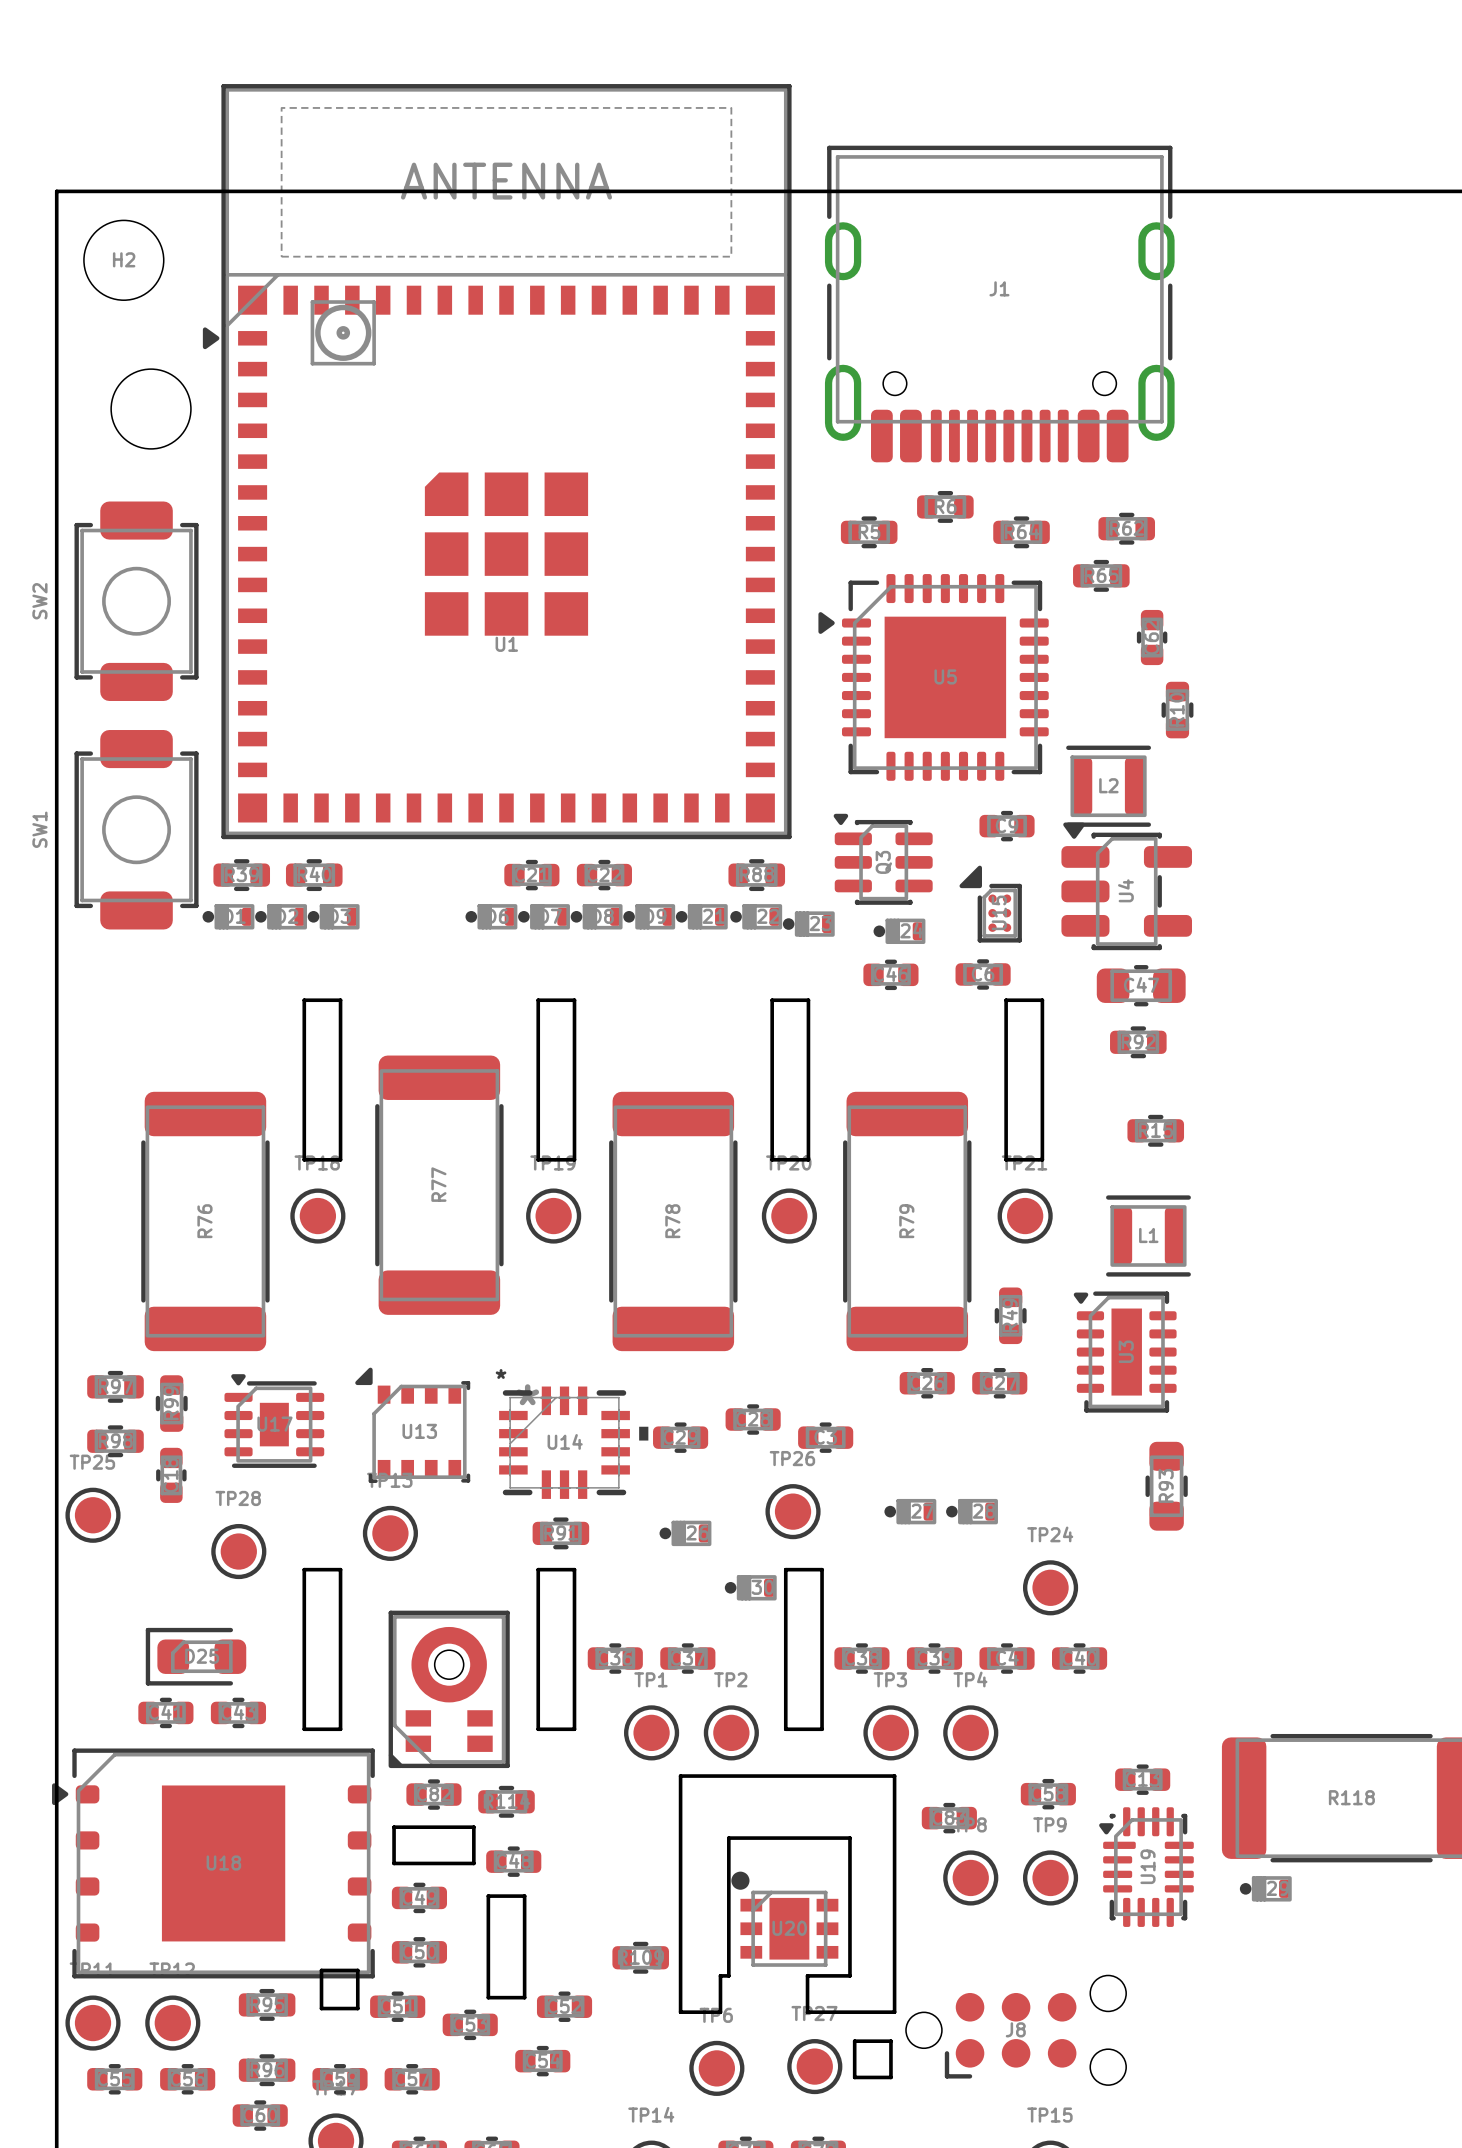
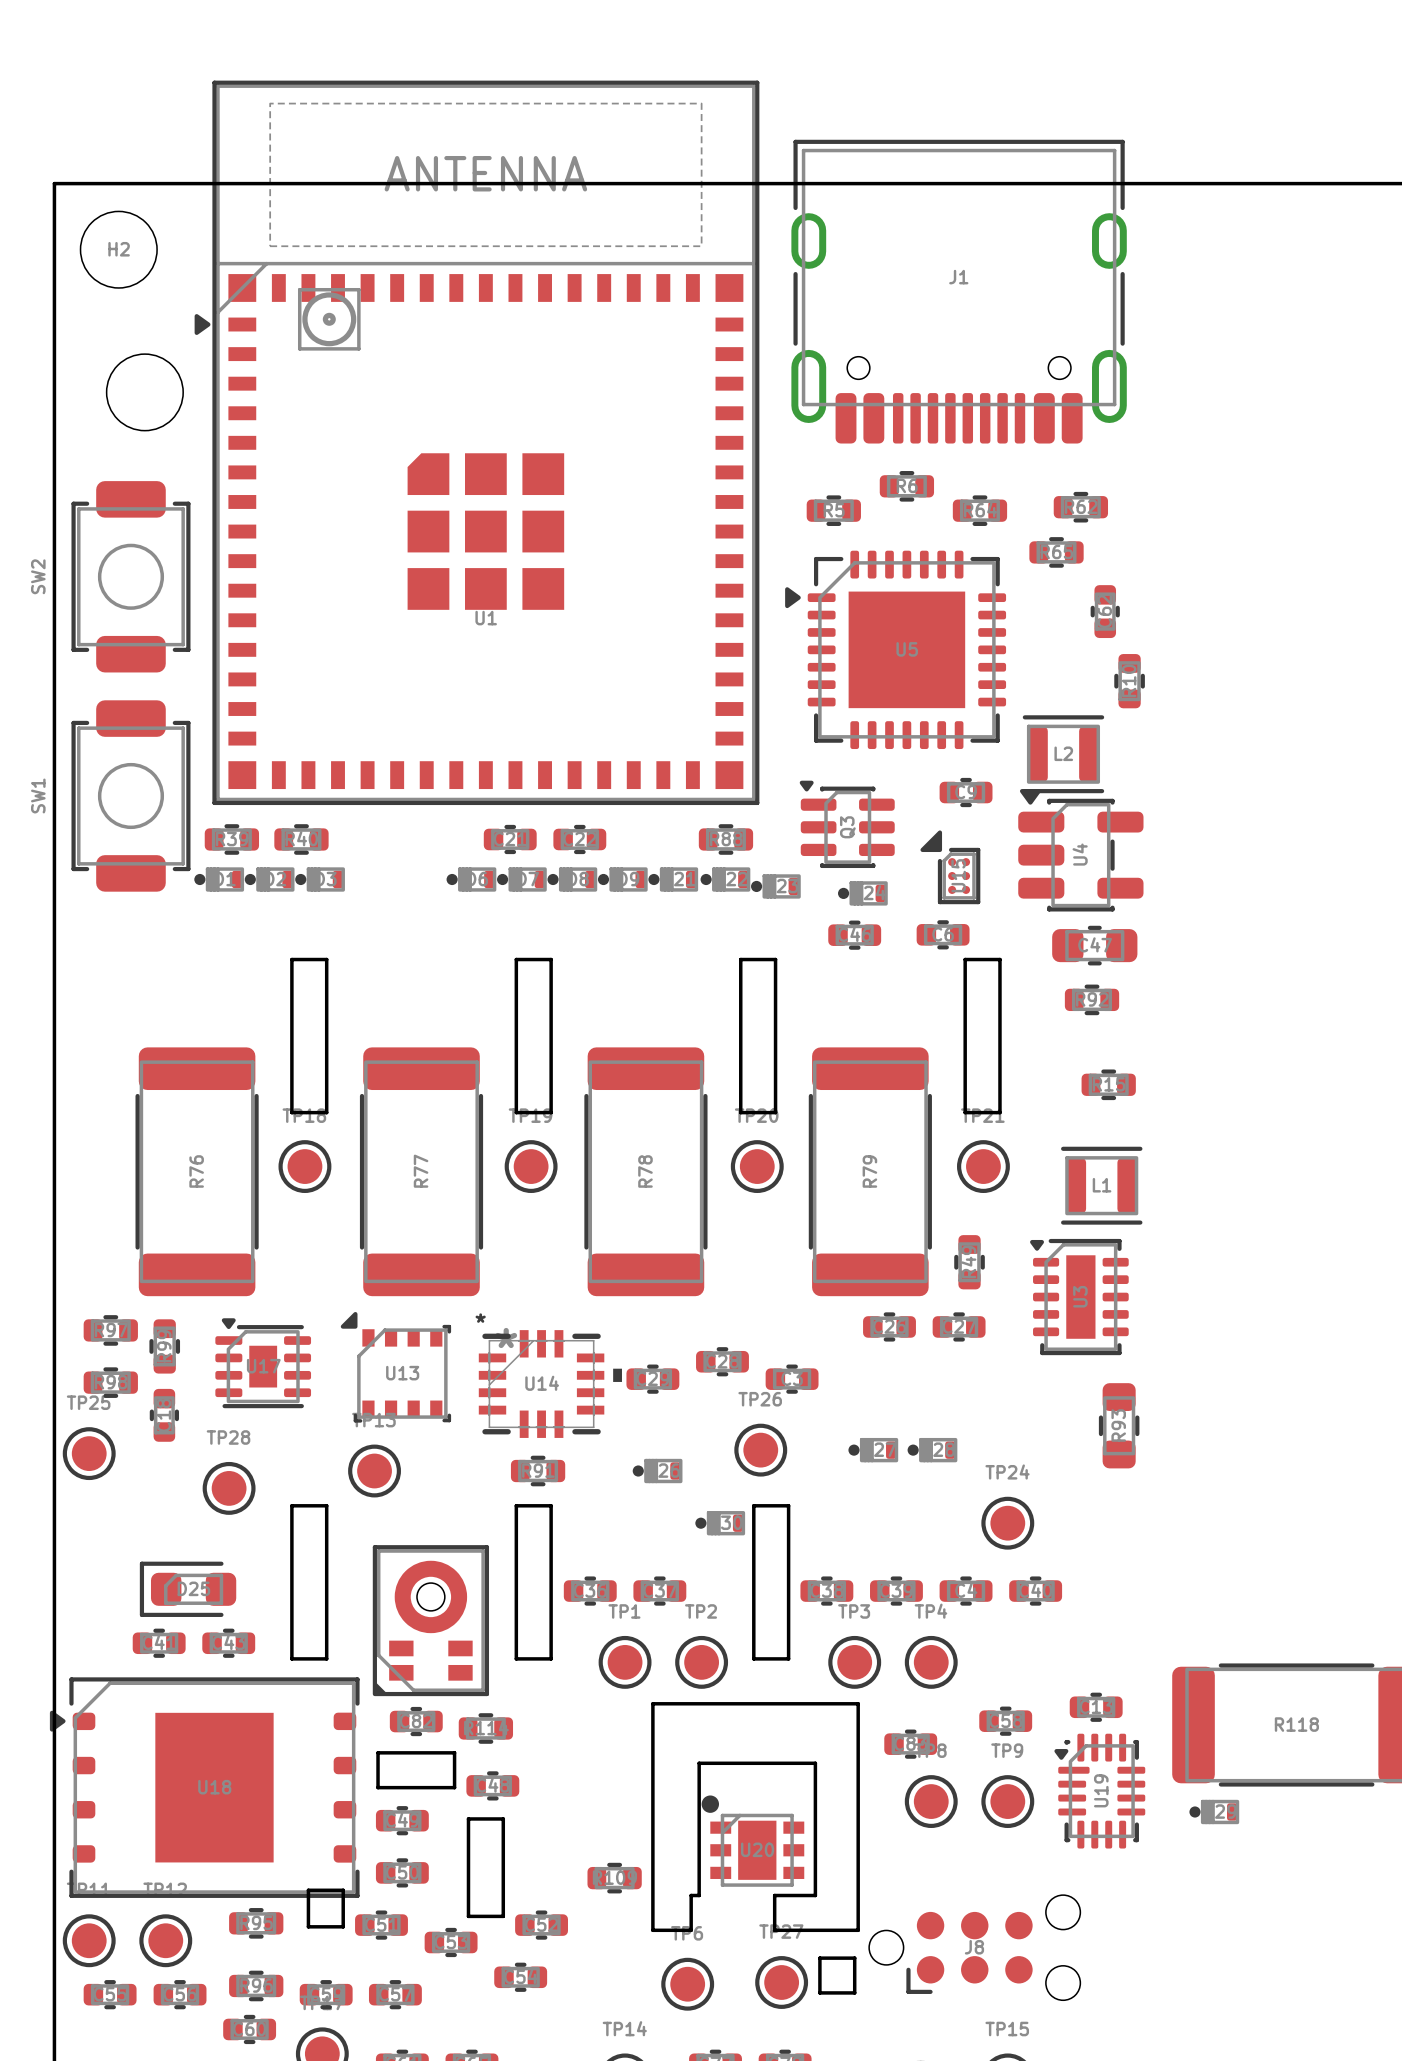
R77 position: (439, 1185) -> (421, 1171)

